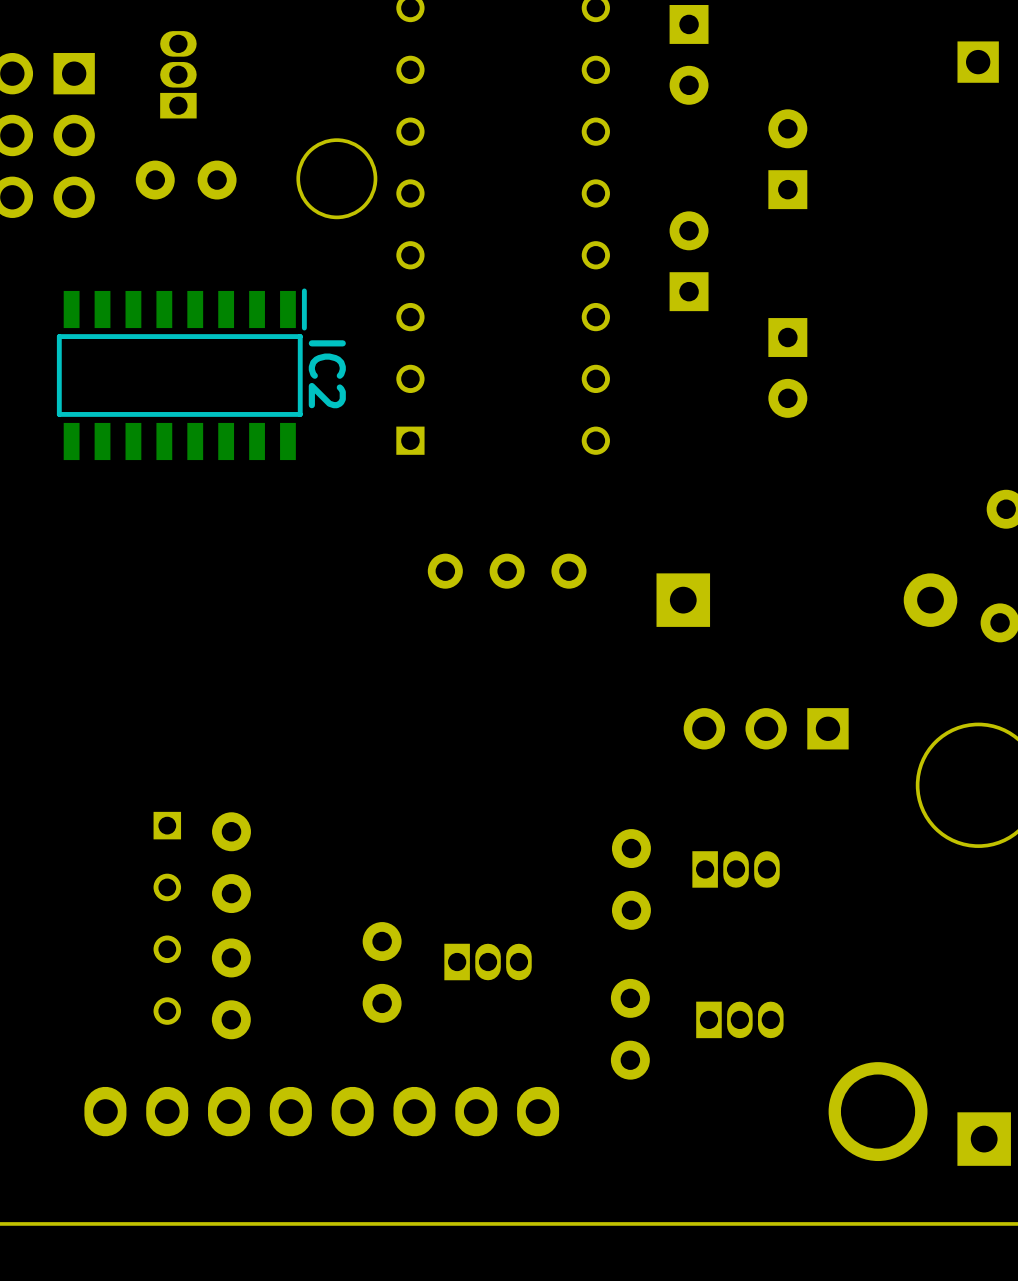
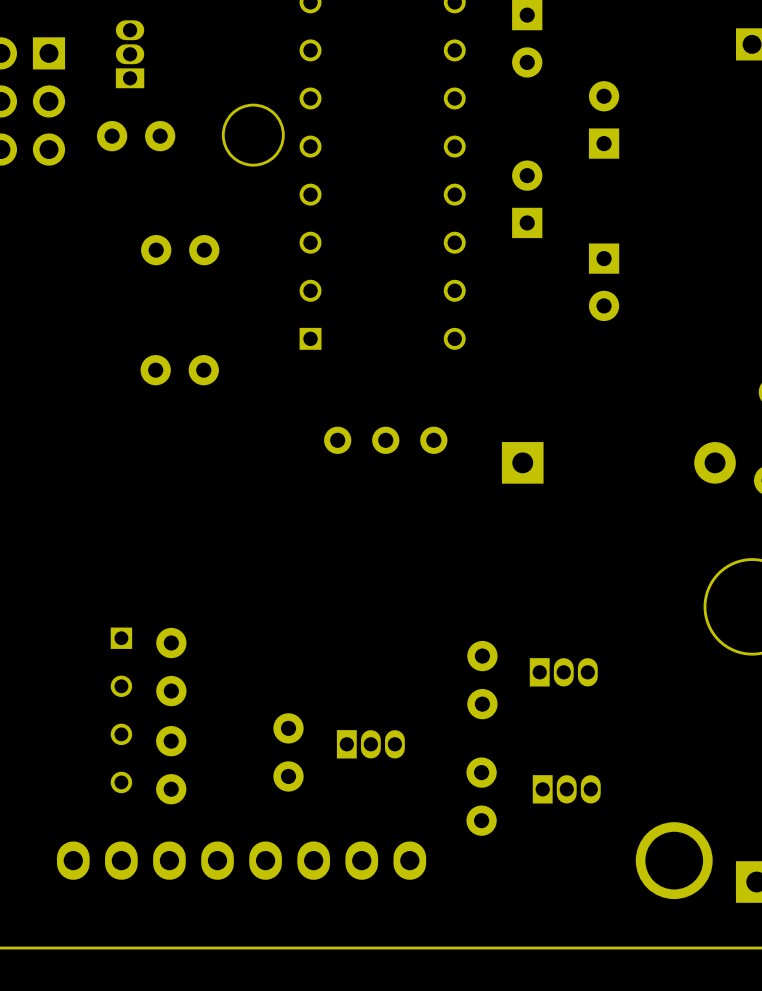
part: none -> (180, 250)
IC2: (181, 374) -> none
part: none -> (179, 370)
part: (766, 728) -> none

